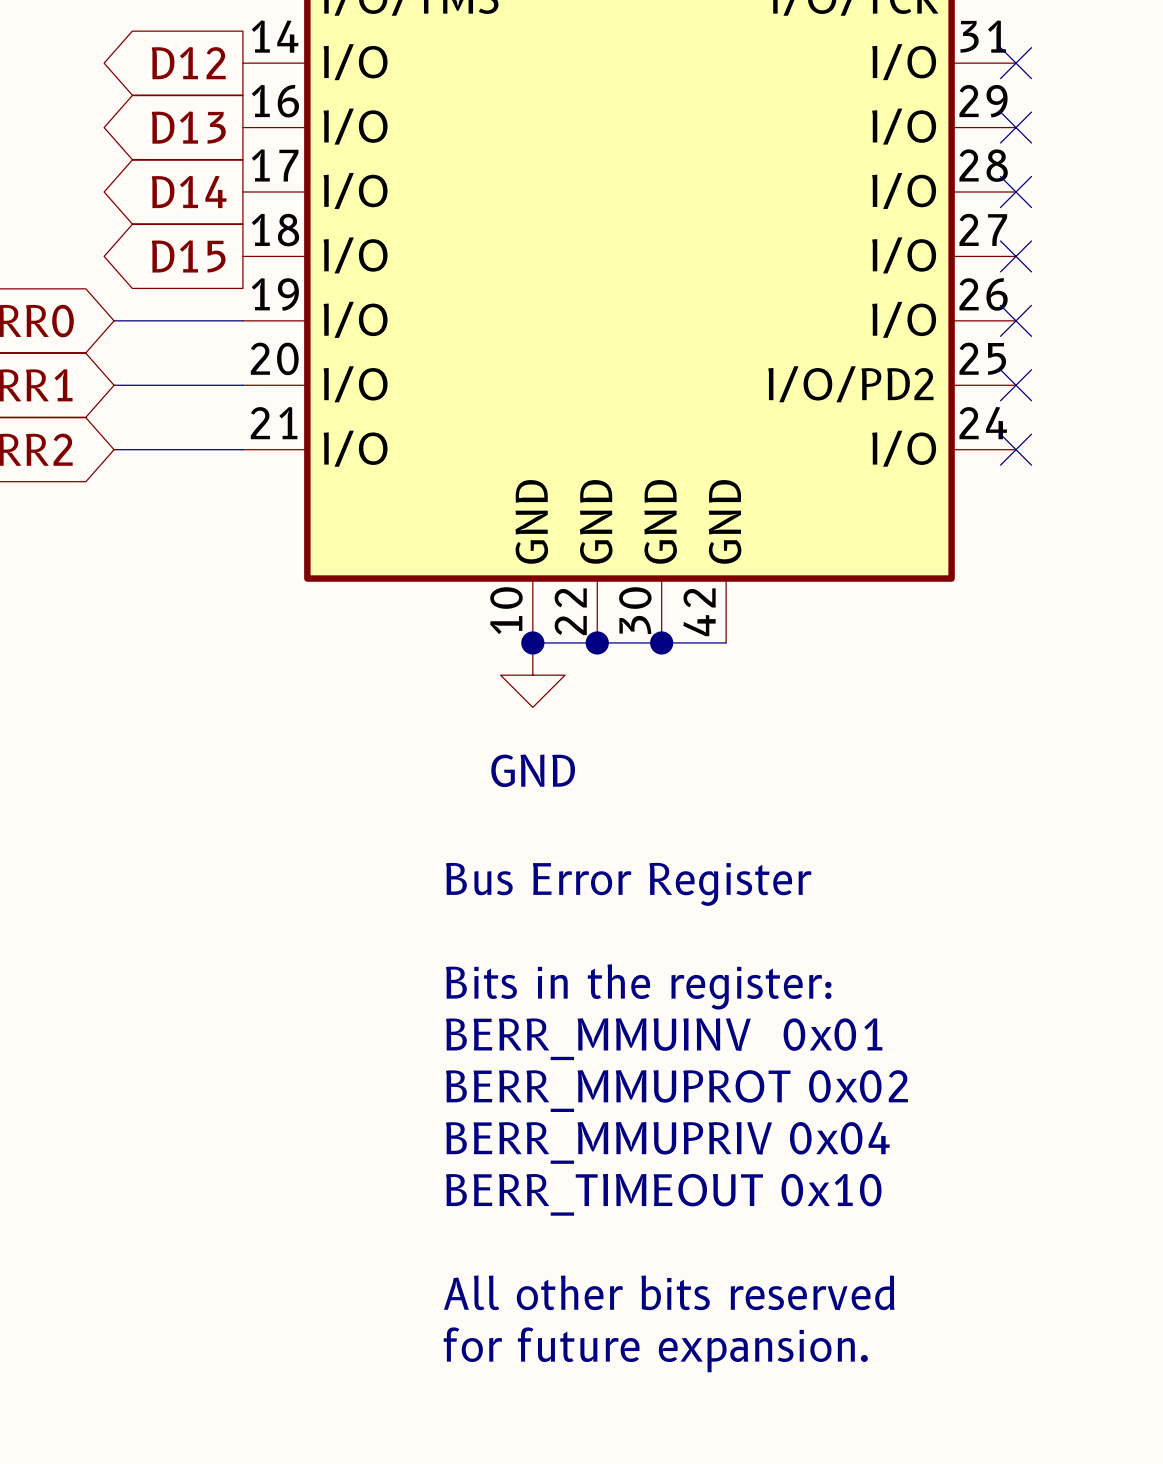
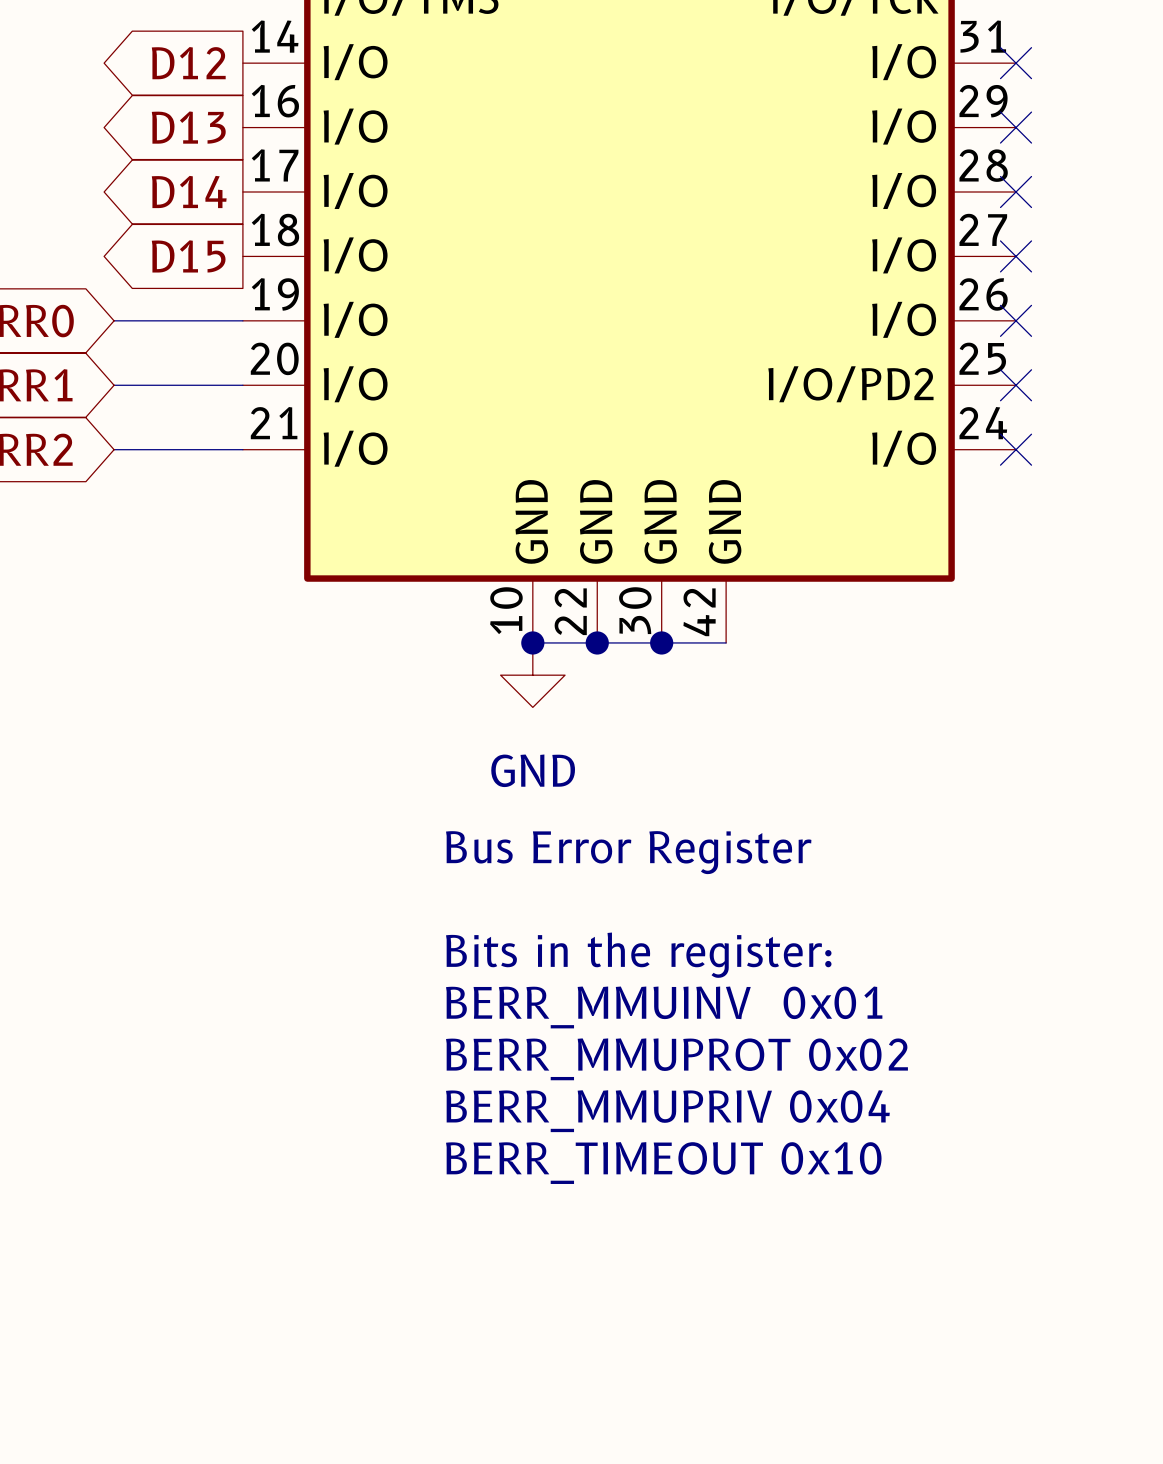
text position: Bus Error Register (628, 884) -> Bus Error Register (628, 852)
text position: Bits in the register: (638, 986) -> Bits in the register: (638, 955)
text position: BERR_MMUINV 0x01 (664, 1039) -> BERR_MMUINV 0x01 (664, 1007)
text position: BERR_MMUPROT 0x02 (676, 1091) -> BERR_MMUPROT 0x02 (676, 1059)
text position: BERR_MMUPRIV 0x04 (667, 1142) -> BERR_MMUPRIV 0x04 (667, 1111)
text position: BERR_TIMEOUT 0x10 (663, 1194) -> BERR_TIMEOUT 0x10 (663, 1163)
text: All other bits reserved (669, 1292) -> none
text: for future expansion. (655, 1349) -> none

